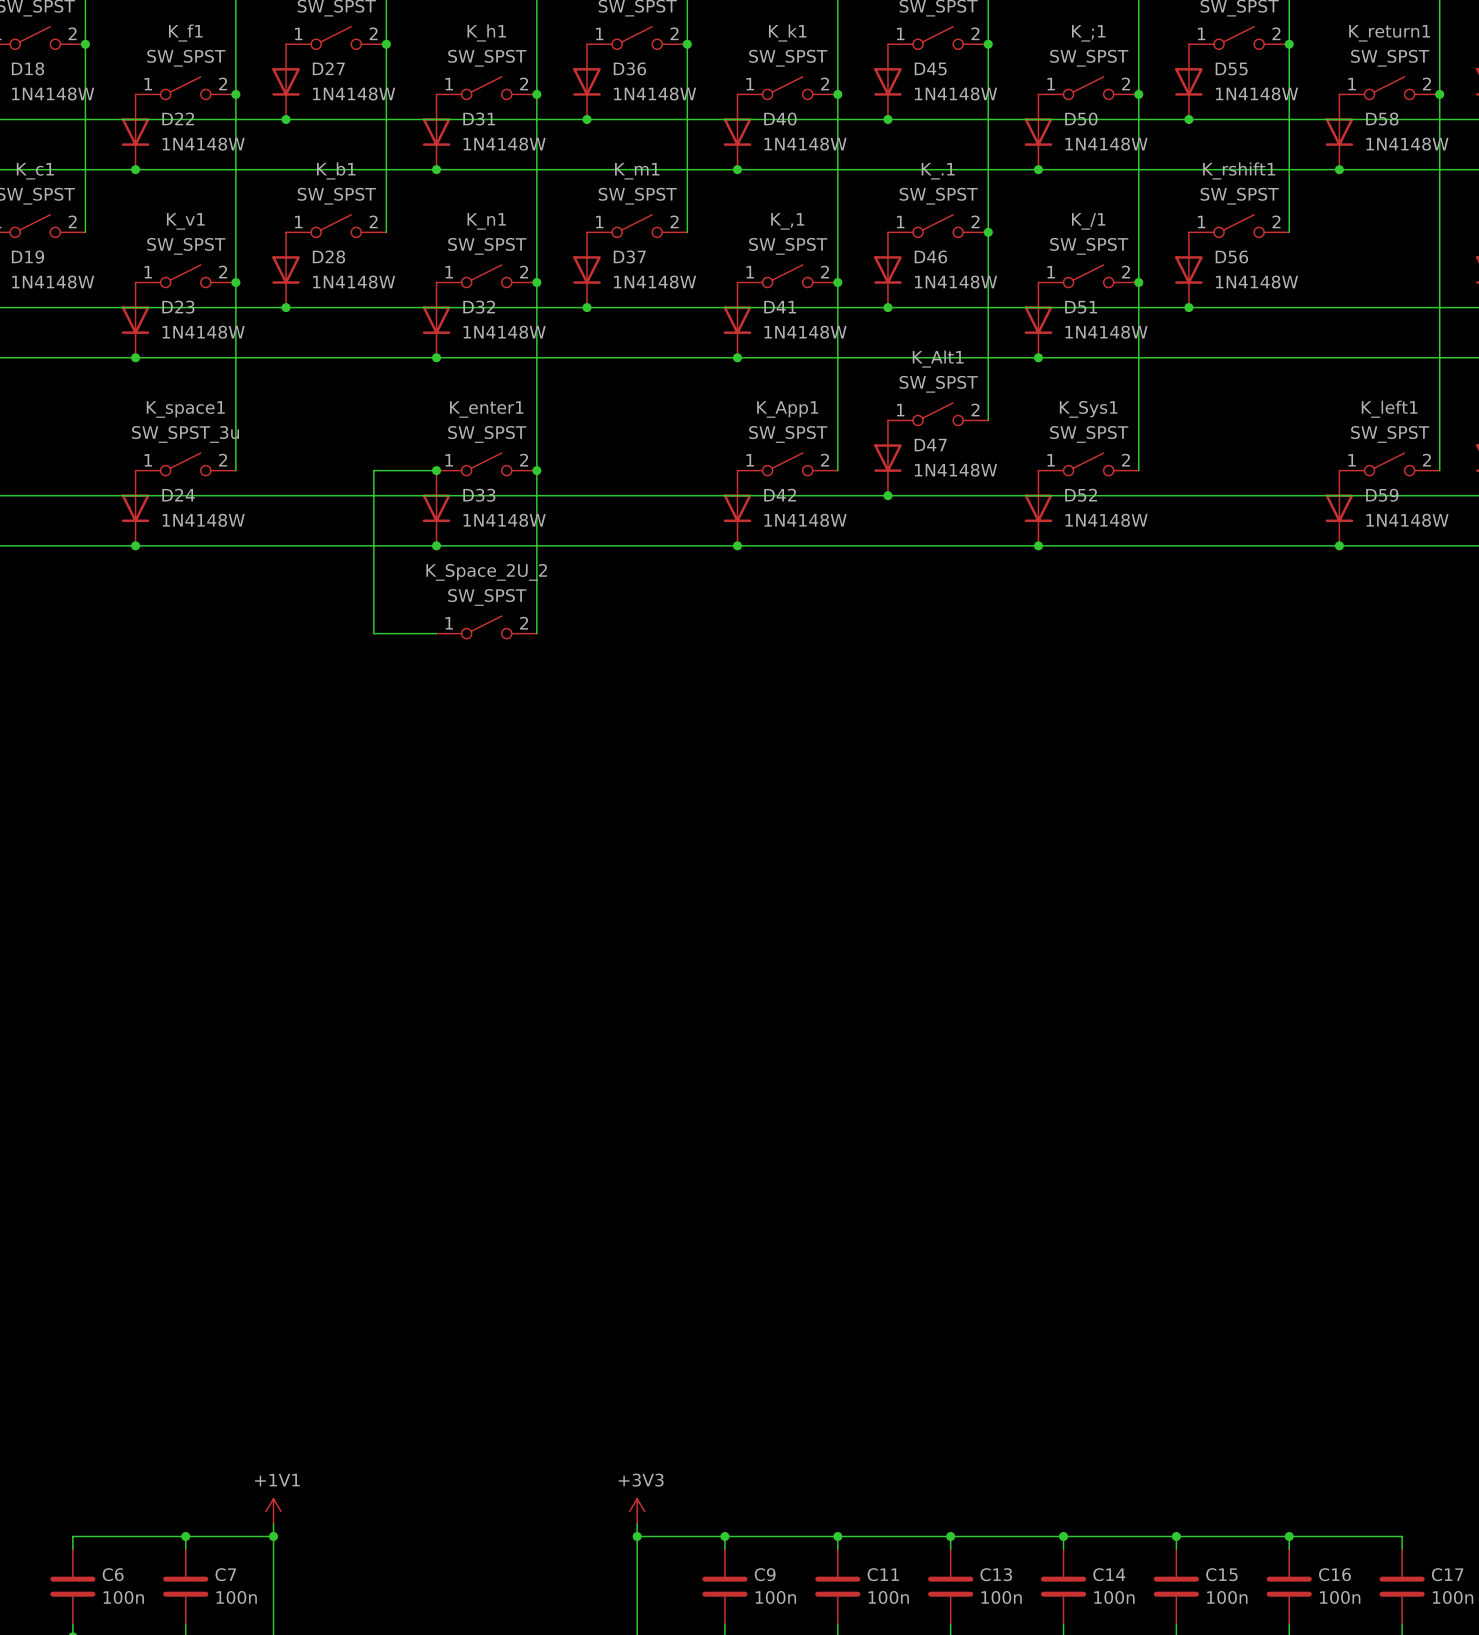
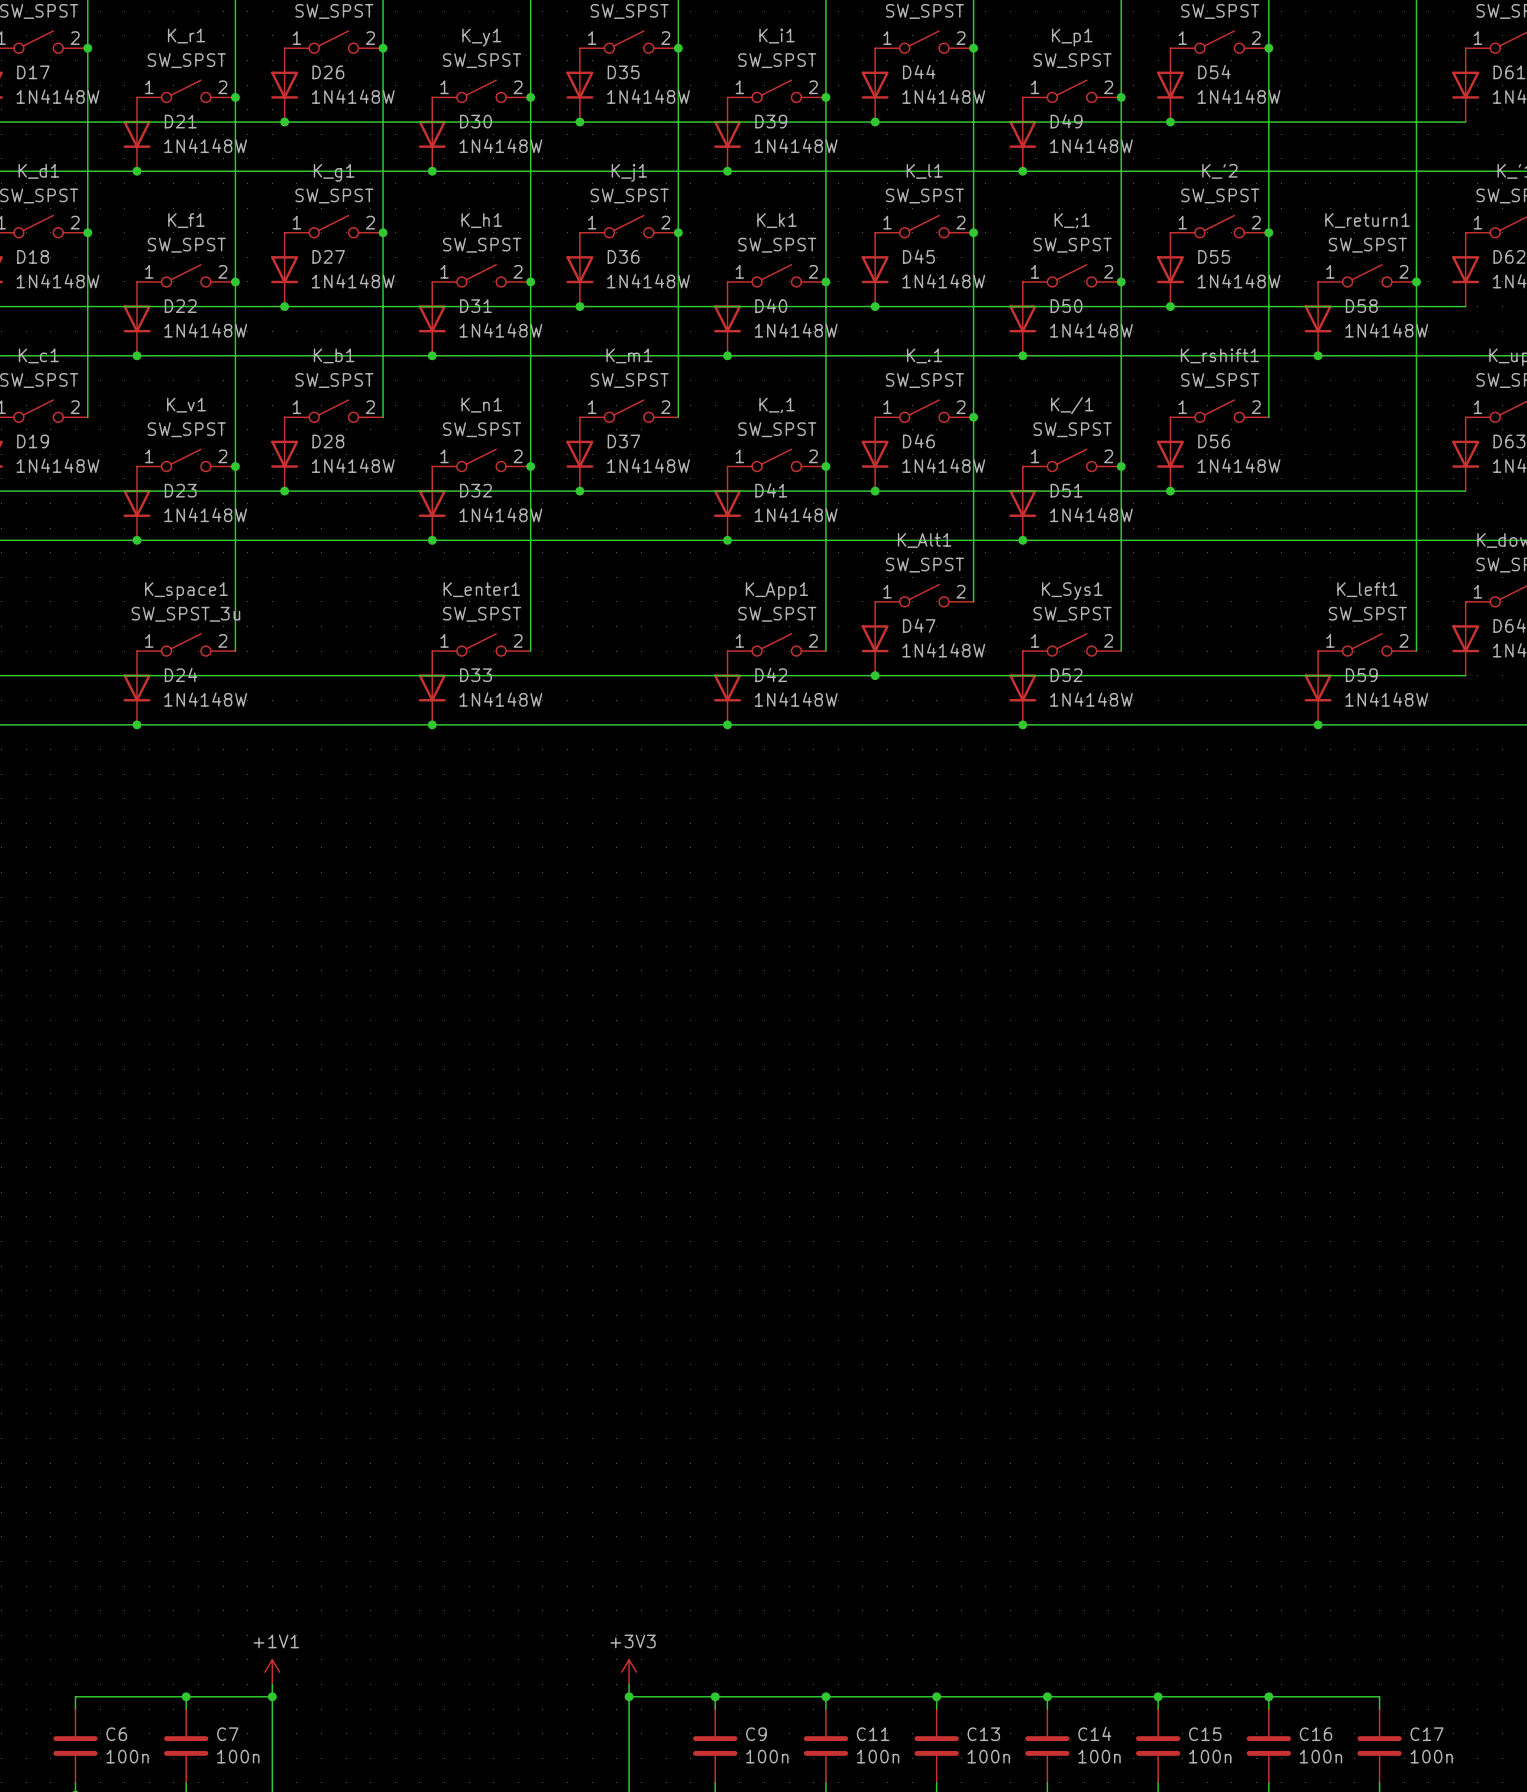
wire: (436, 470) (373, 470) (373, 633) (436, 633) -> none
junction: (436, 470) -> none
wire: (536, 470) (536, 633) -> none
junction: (536, 470) -> none
K_Space_2U_2: SW_SPST (486, 627) -> none

